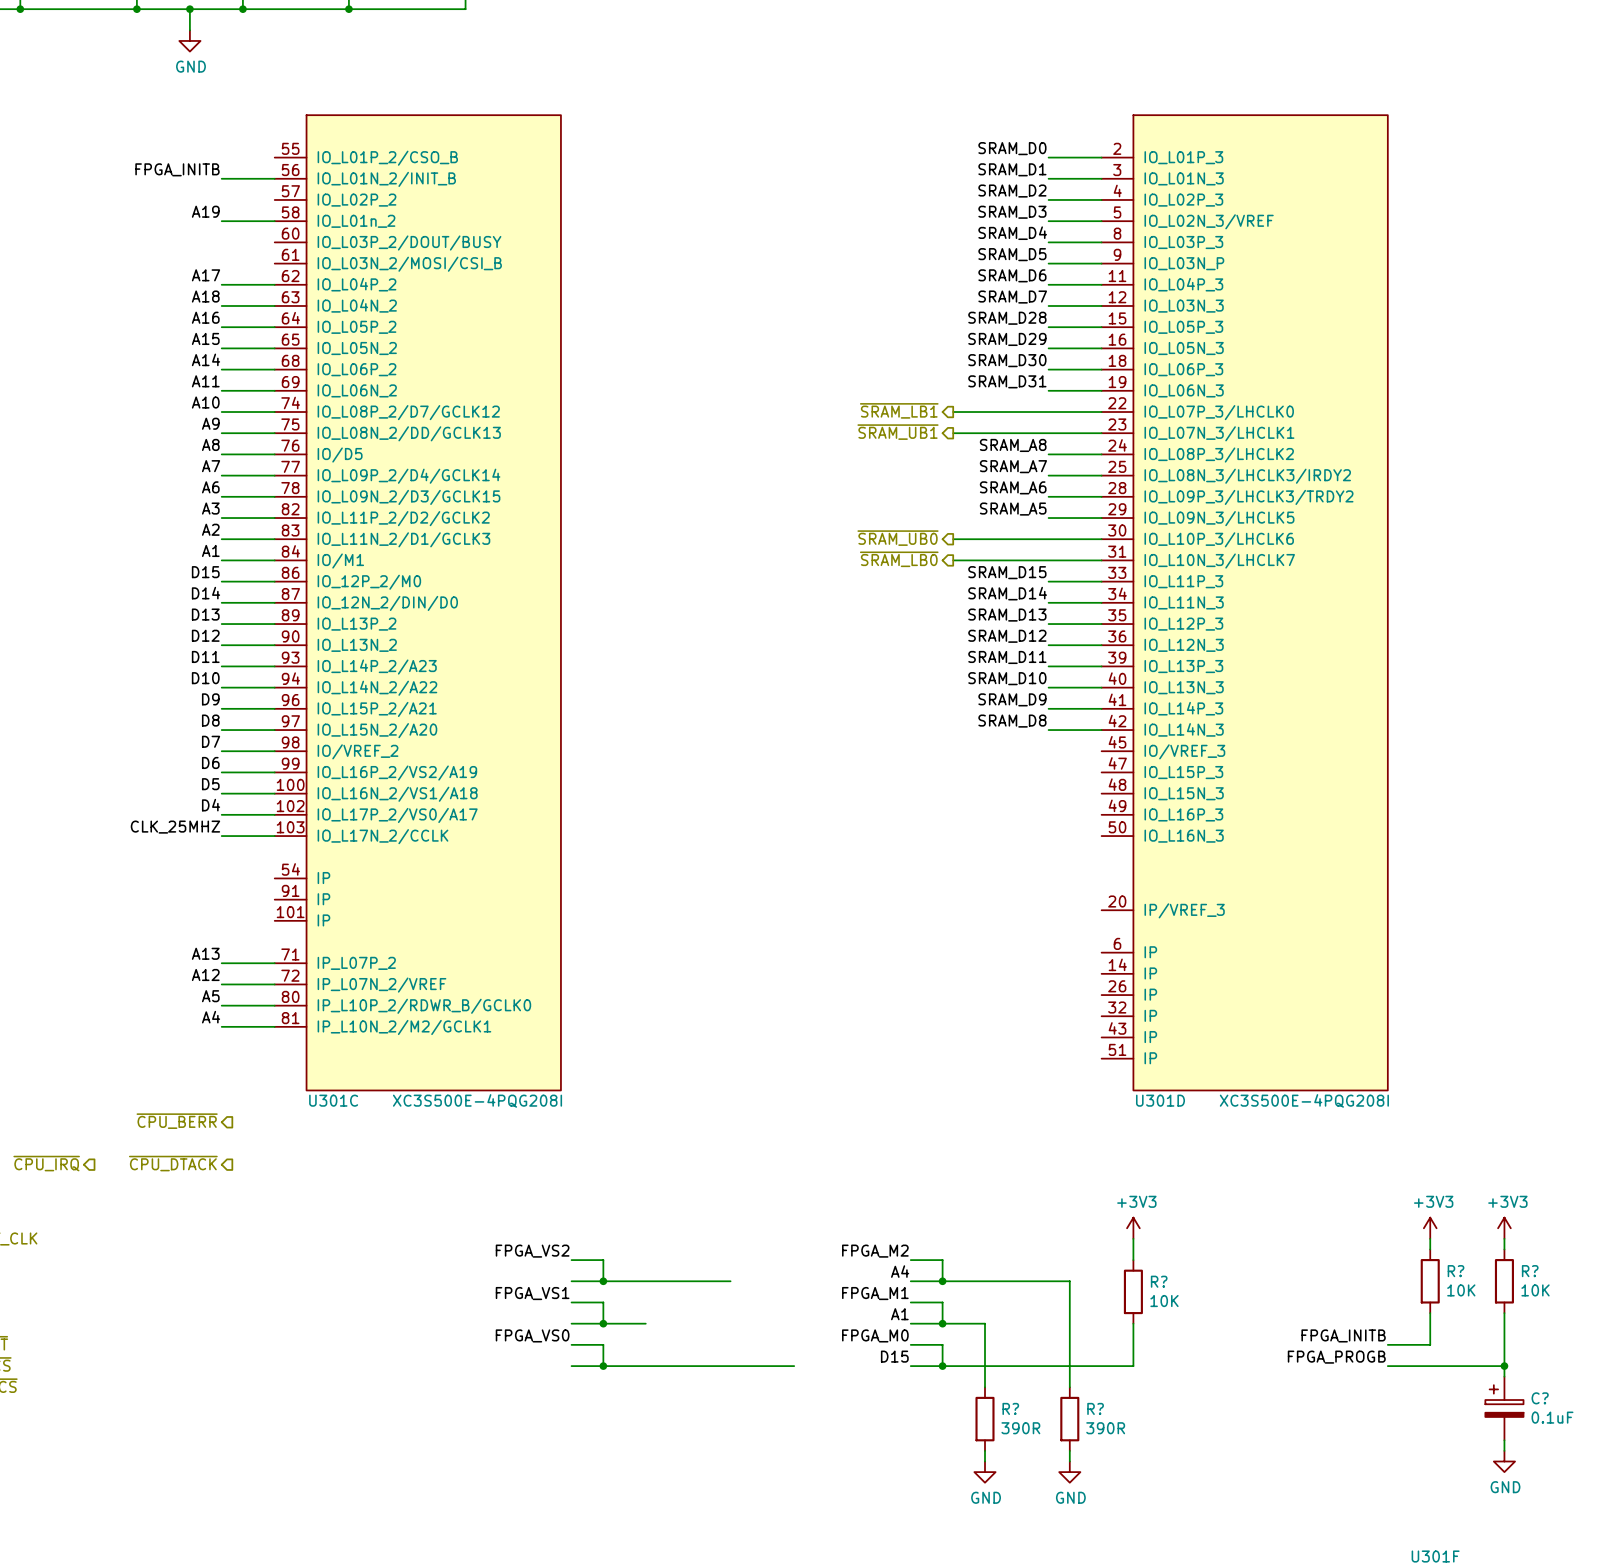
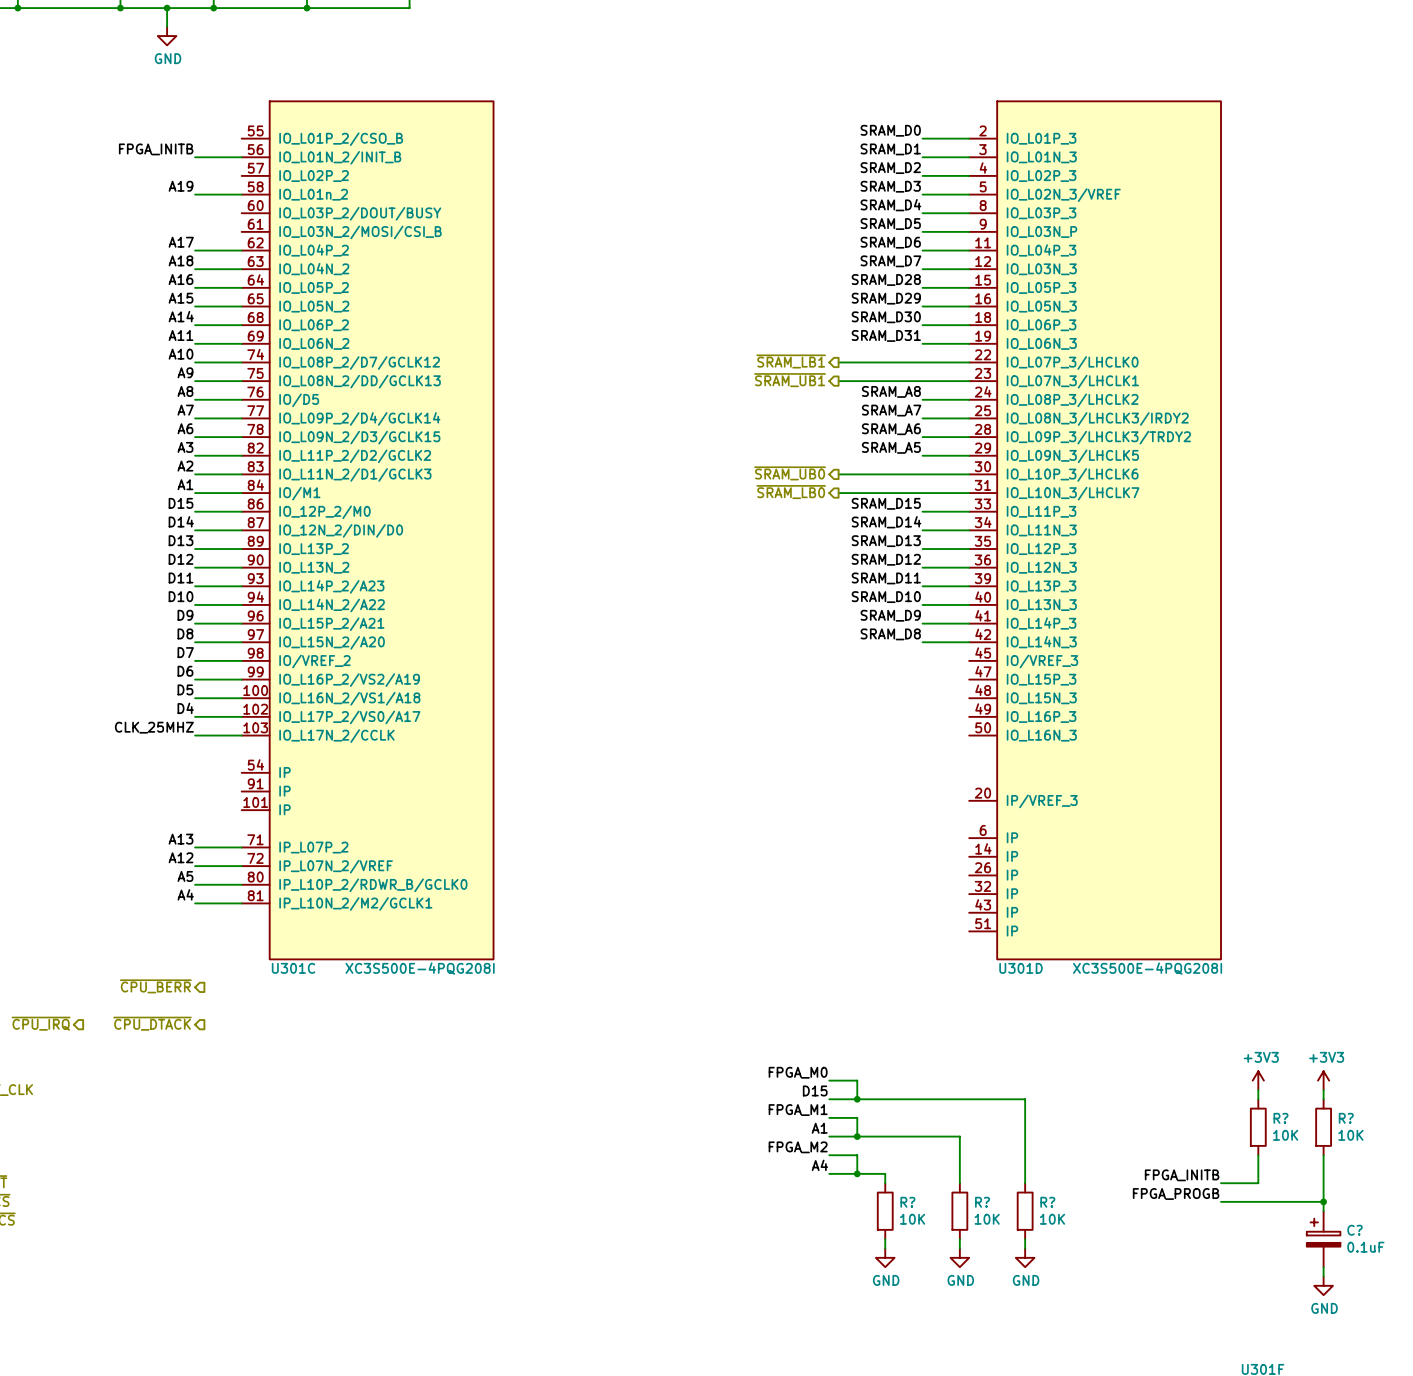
power symbol: +3V3 (1133, 1228) -> none
wire: (1133, 1238) (1133, 1260) -> none
wire: none -> (829, 1099) (1025, 1099) (1025, 1183)
junction: none -> (857, 1099)
label: FPGA_VS2 (532, 1251) -> none
label position: FPGA_M2 (875, 1251) -> FPGA_M2 (798, 1147)
wire: (571, 1260) (603, 1260) (603, 1281) -> none
wire: (910, 1260) (942, 1260) (942, 1281) -> (829, 1080) (857, 1080) (857, 1099)
label position: A4 (900, 1271) -> A4 (819, 1165)
wire: (571, 1281) (730, 1281) -> none
junction: (603, 1281) -> none
wire: (910, 1281) (1069, 1281) (1069, 1387) -> none
junction: (942, 1281) -> none
wire: none -> (829, 1136) (959, 1136) (959, 1183)
junction: none -> (857, 1136)
R?: 10K (1133, 1291) -> none
label: FPGA_VS1 (532, 1293) -> none
label position: FPGA_M1 (875, 1293) -> FPGA_M1 (798, 1110)
wire: (571, 1302) (603, 1302) (603, 1323) -> none
wire: (910, 1302) (942, 1302) (942, 1323) -> (829, 1117) (857, 1117) (857, 1136)
label position: A1 (899, 1314) -> A1 (819, 1128)
wire: (571, 1323) (645, 1323) -> none
junction: (603, 1323) -> none
wire: (910, 1323) (985, 1323) (985, 1387) -> none
junction: (942, 1323) -> none
wire: (1133, 1323) (1133, 1366) (910, 1366) -> none
wire: none -> (829, 1173) (885, 1173) (885, 1183)
junction: none -> (857, 1173)
label: FPGA_VS0 (532, 1335) -> none
label position: FPGA_M0 (875, 1335) -> FPGA_M0 (798, 1072)
wire: (571, 1344) (603, 1344) (603, 1366) -> none
wire: (910, 1344) (942, 1344) (942, 1366) -> (829, 1155) (857, 1155) (857, 1173)
label position: D15 (894, 1356) -> D15 (815, 1090)
wire: (571, 1366) (794, 1366) -> none
junction: (603, 1366) -> none
junction: (942, 1366) -> none
R?: none -> 10K (885, 1211)
R?: none -> 10K (959, 1211)
R?: none -> 10K (1025, 1211)
wire: none -> (1025, 1239) (1025, 1248)
R?: 390R (985, 1419) -> none
R?: 390R (1069, 1419) -> none
power symbol: none -> GND (885, 1257)
power symbol: none -> GND (959, 1257)
power symbol: none -> GND (1025, 1257)
wire: (985, 1450) (985, 1461) -> (885, 1239) (885, 1248)
wire: (1069, 1450) (1069, 1461) -> (959, 1239) (959, 1248)
power symbol: GND (985, 1472) -> none
power symbol: GND (1069, 1472) -> none

